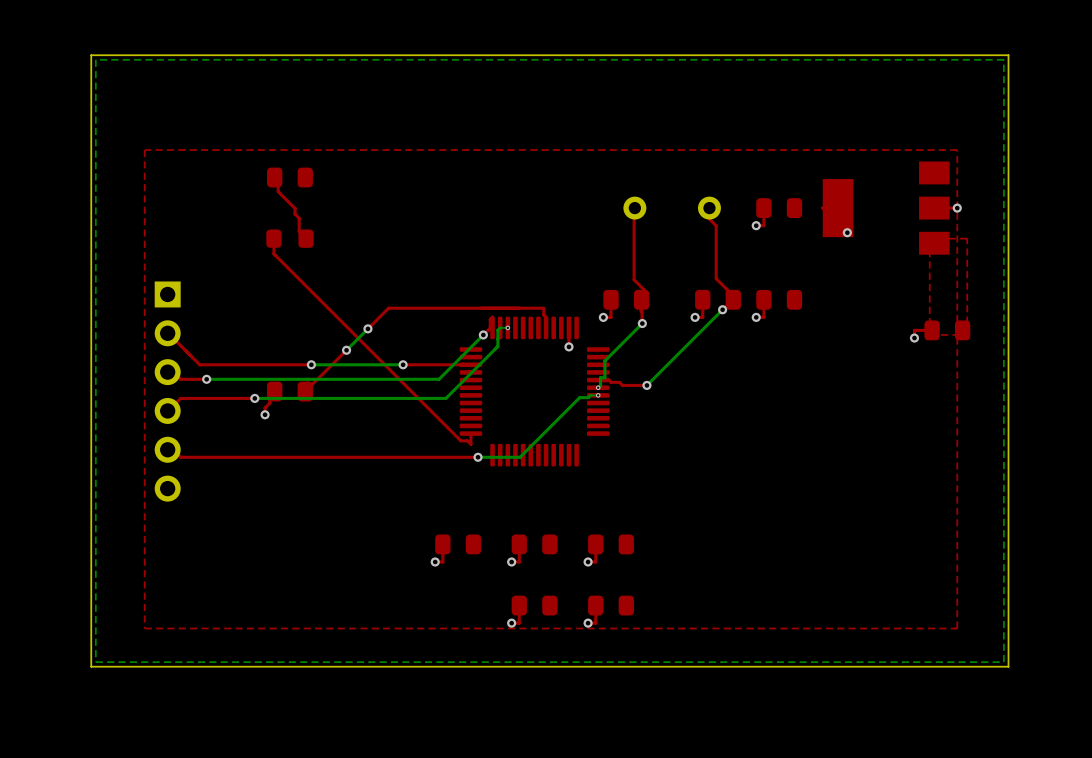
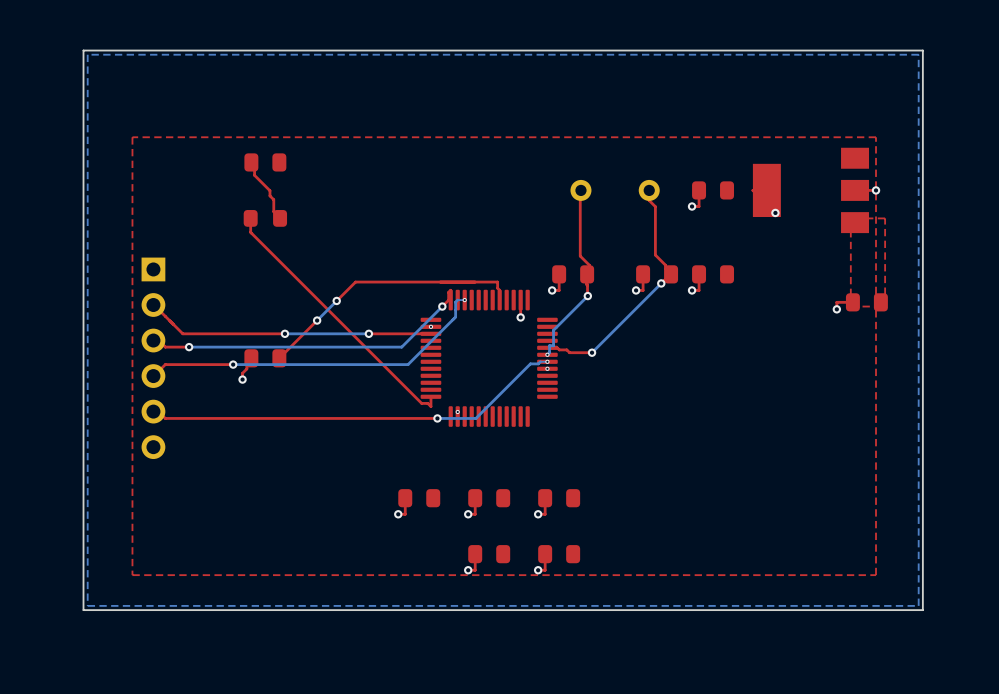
via: none -> (430, 326)
via: none -> (547, 368)
via: none -> (457, 411)

